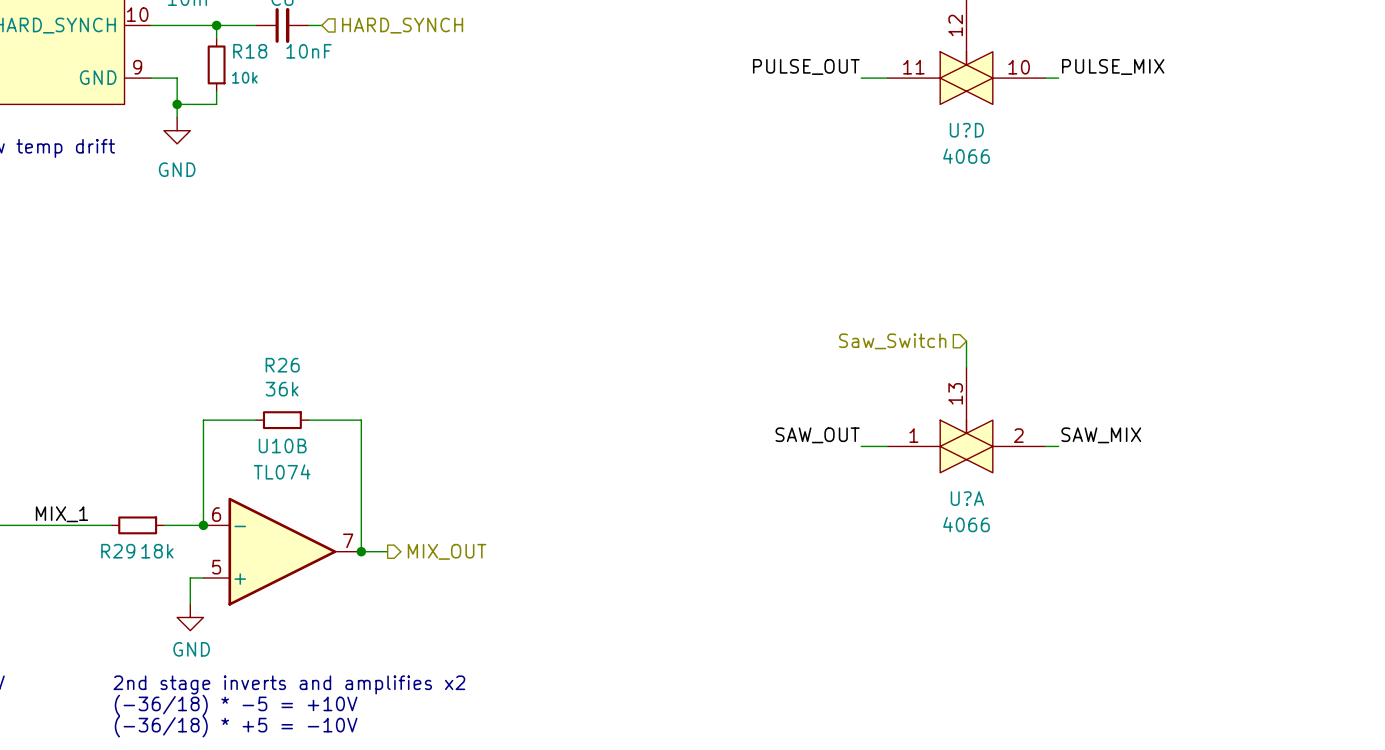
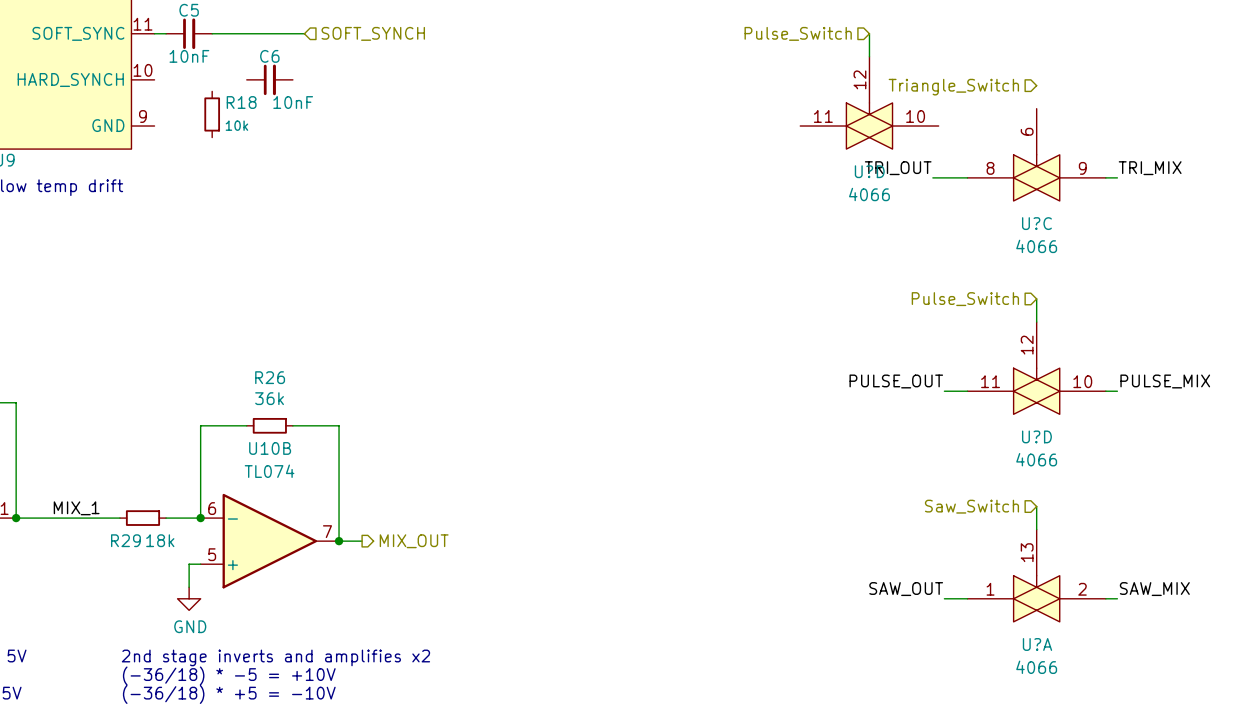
wire: (150, 25) (256, 25) -> none
wire: (216, 25) (216, 38) -> none
junction: (216, 25) -> none
wire: (308, 25) (321, 25) -> none
hierarchical label: HARD_SYNCH (402, 25) -> none
hierarchical label: none -> Triangle_Switch (953, 87)
label: PULSE_OUT (806, 66) -> none
label: PULSE_MIX (1113, 66) -> none
wire: (150, 78) (177, 78) (177, 117) -> none
wire: (861, 78) (887, 78) -> none
wire: (1045, 78) (1058, 78) -> (1105, 177) (1117, 177)
wire: (216, 91) (216, 104) (177, 104) -> none
junction: (177, 104) -> none
U?C: none -> 4066 (1036, 154)
label: none -> TRI_OUT (898, 168)
label: none -> TRI_MIX (1150, 168)
power symbol: GND (177, 130) -> none
wire: none -> (932, 177) (967, 177)
hierarchical label: none -> Pulse_Switch (965, 299)
hierarchical label position: Saw_Switch (892, 341) -> Saw_Switch (971, 506)
wire: (966, 341) (966, 367) -> (1036, 298) (1036, 322)
U?D: none -> 4066 (1036, 368)
label: none -> PULSE_OUT (896, 381)
label: none -> PULSE_MIX (1165, 381)
U?A position: (966, 420) -> (1036, 575)
label position: SAW_OUT (817, 435) -> SAW_OUT (906, 589)
label position: SAW_MIX (1101, 435) -> SAW_MIX (1154, 589)
wire: (861, 446) (887, 446) -> (944, 391) (967, 391)
wire: (1045, 446) (1058, 446) -> (1105, 391) (1117, 391)
wire: none -> (1036, 506) (1036, 529)
wire: none -> (944, 598) (967, 598)
wire: none -> (1105, 598) (1117, 598)

